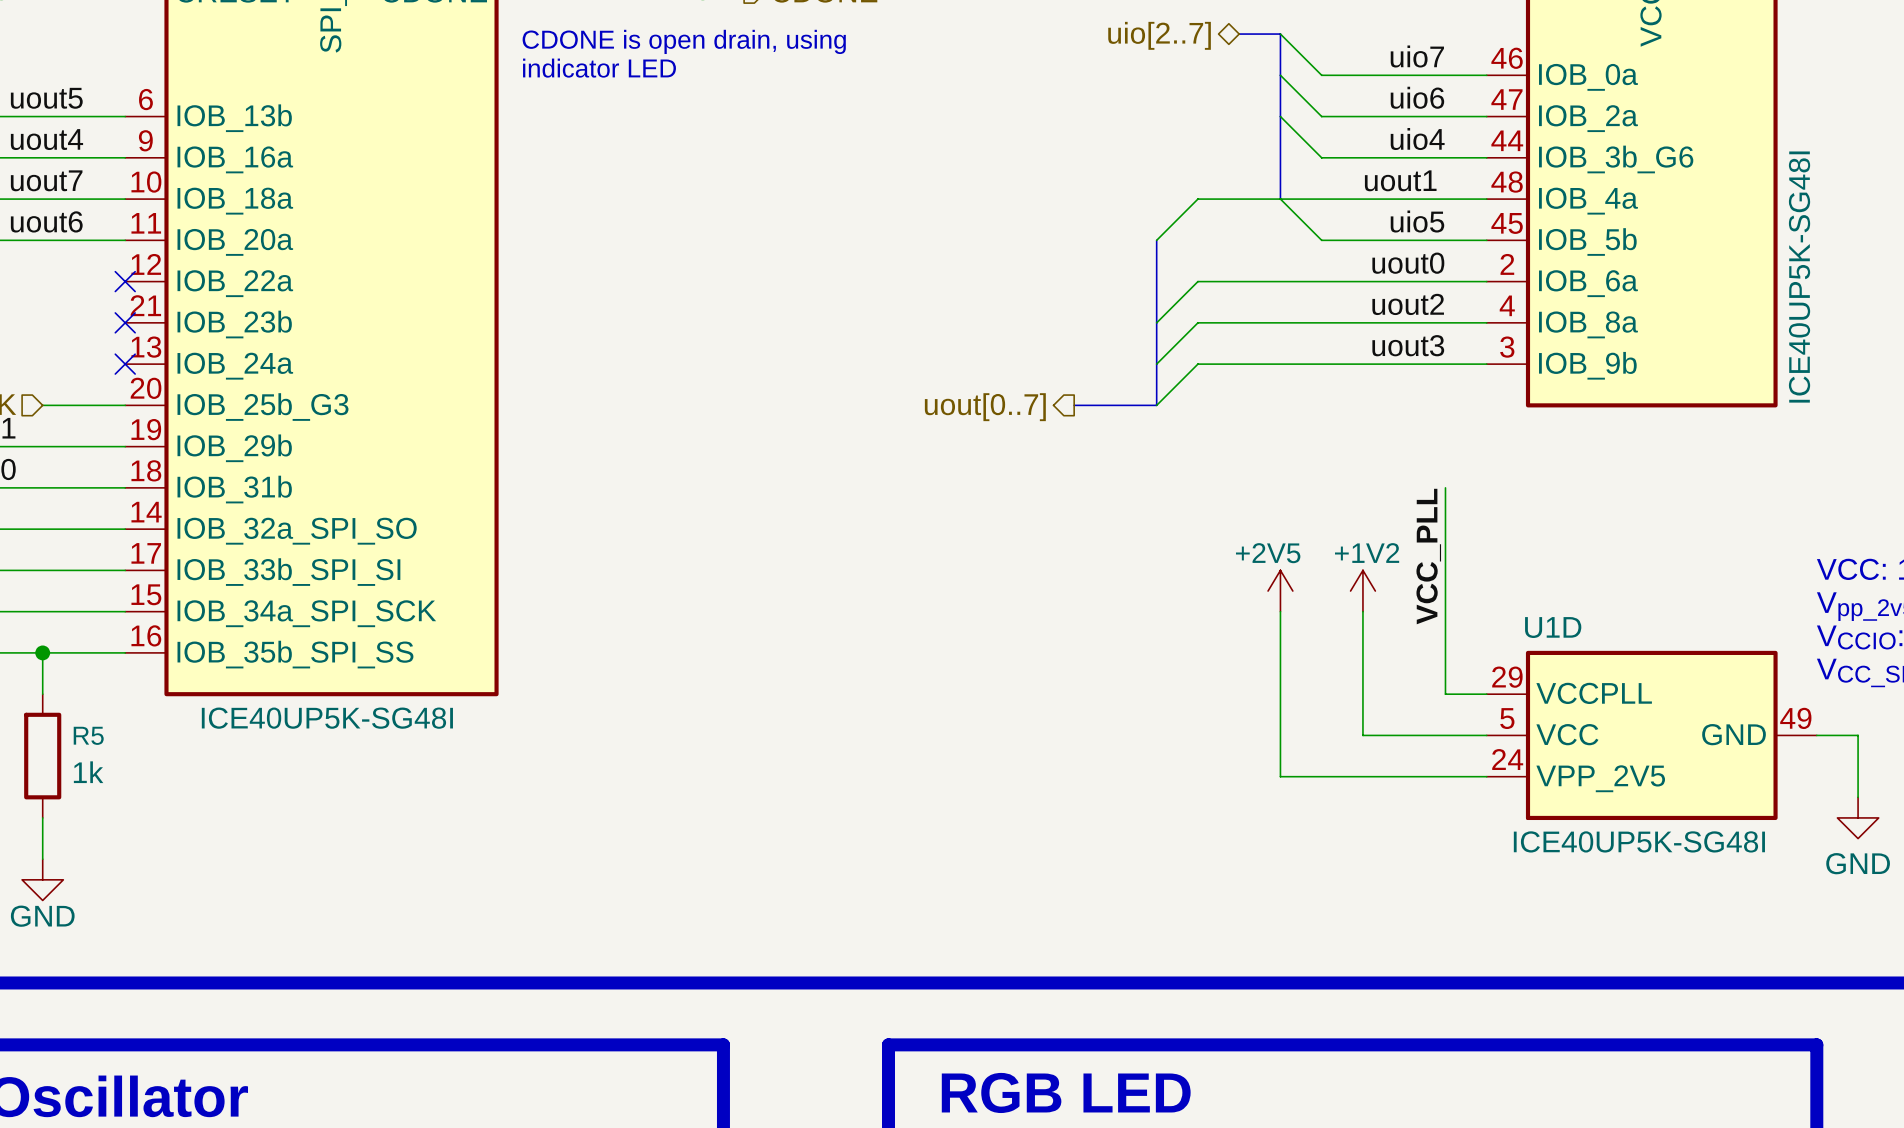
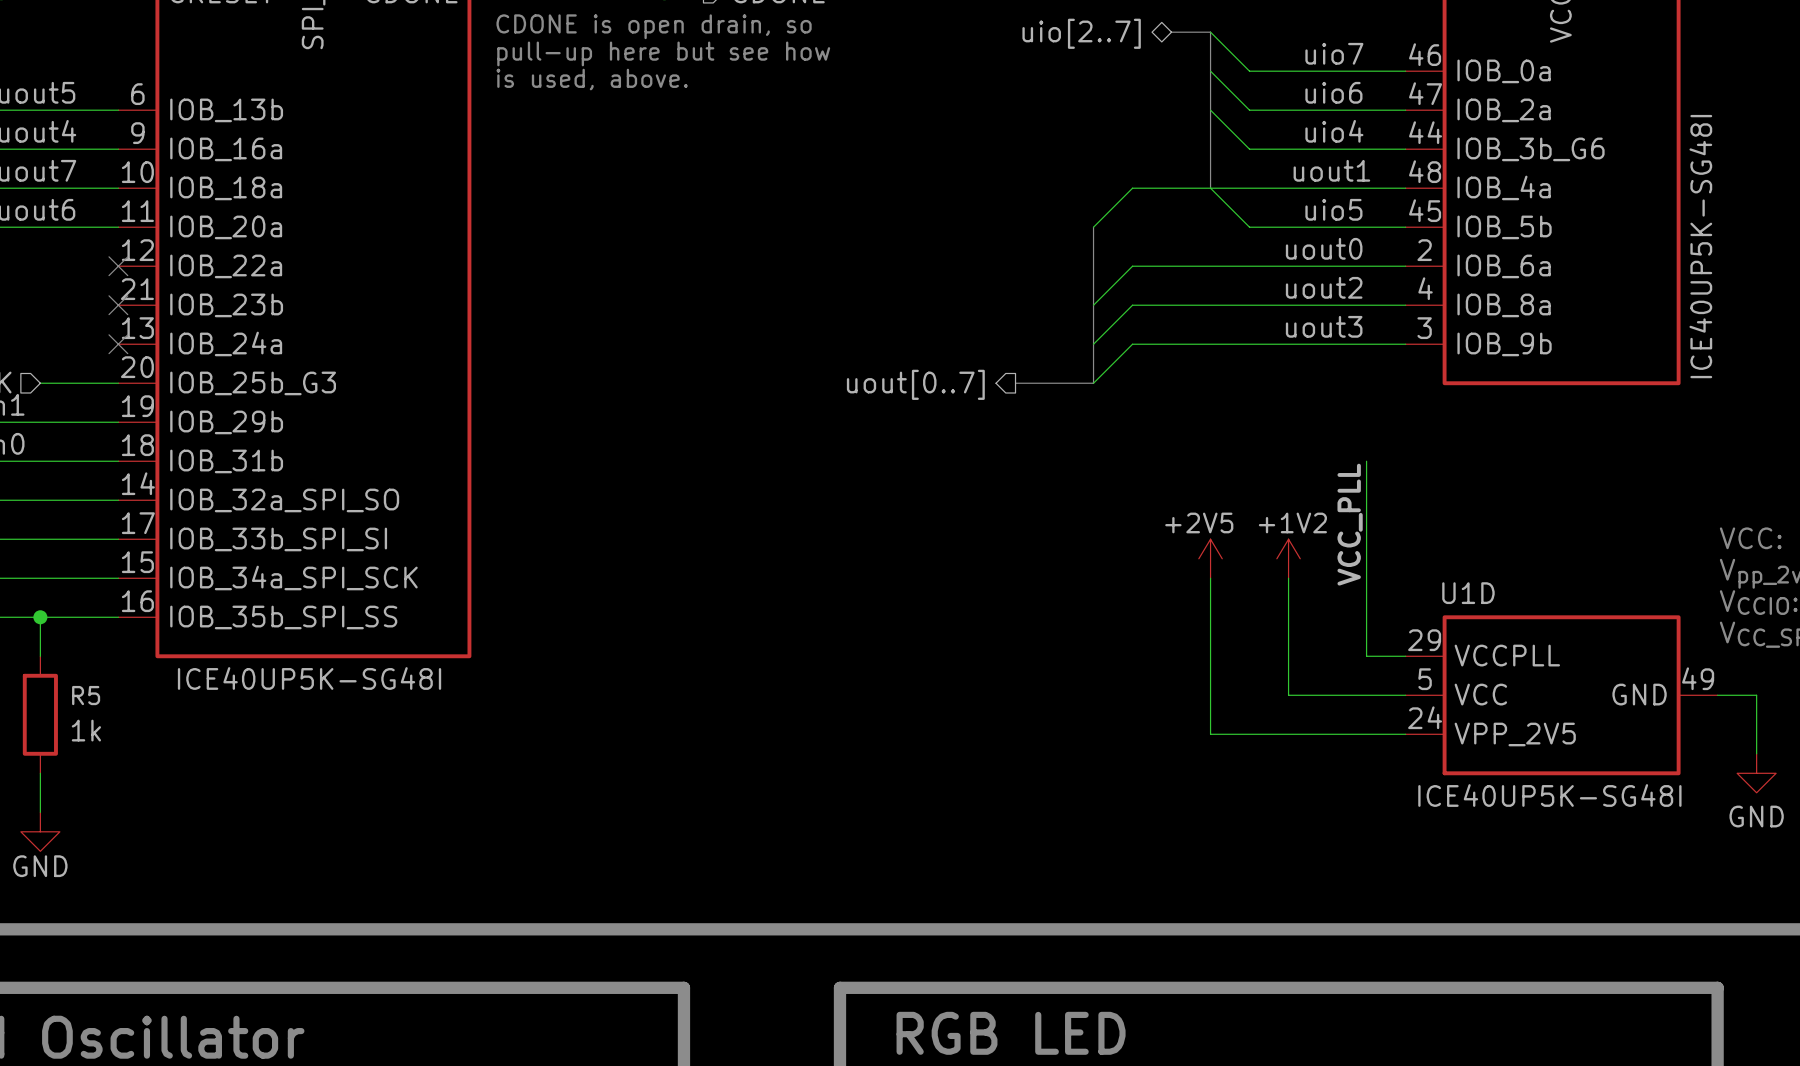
text: CDONE is open drain, using (684, 41) -> CDONE is open drain, so (654, 26)
text: none -> pull-up here but see how (663, 53)
text: indicator LED (599, 68) -> none
text: none -> is used, above. (592, 79)

